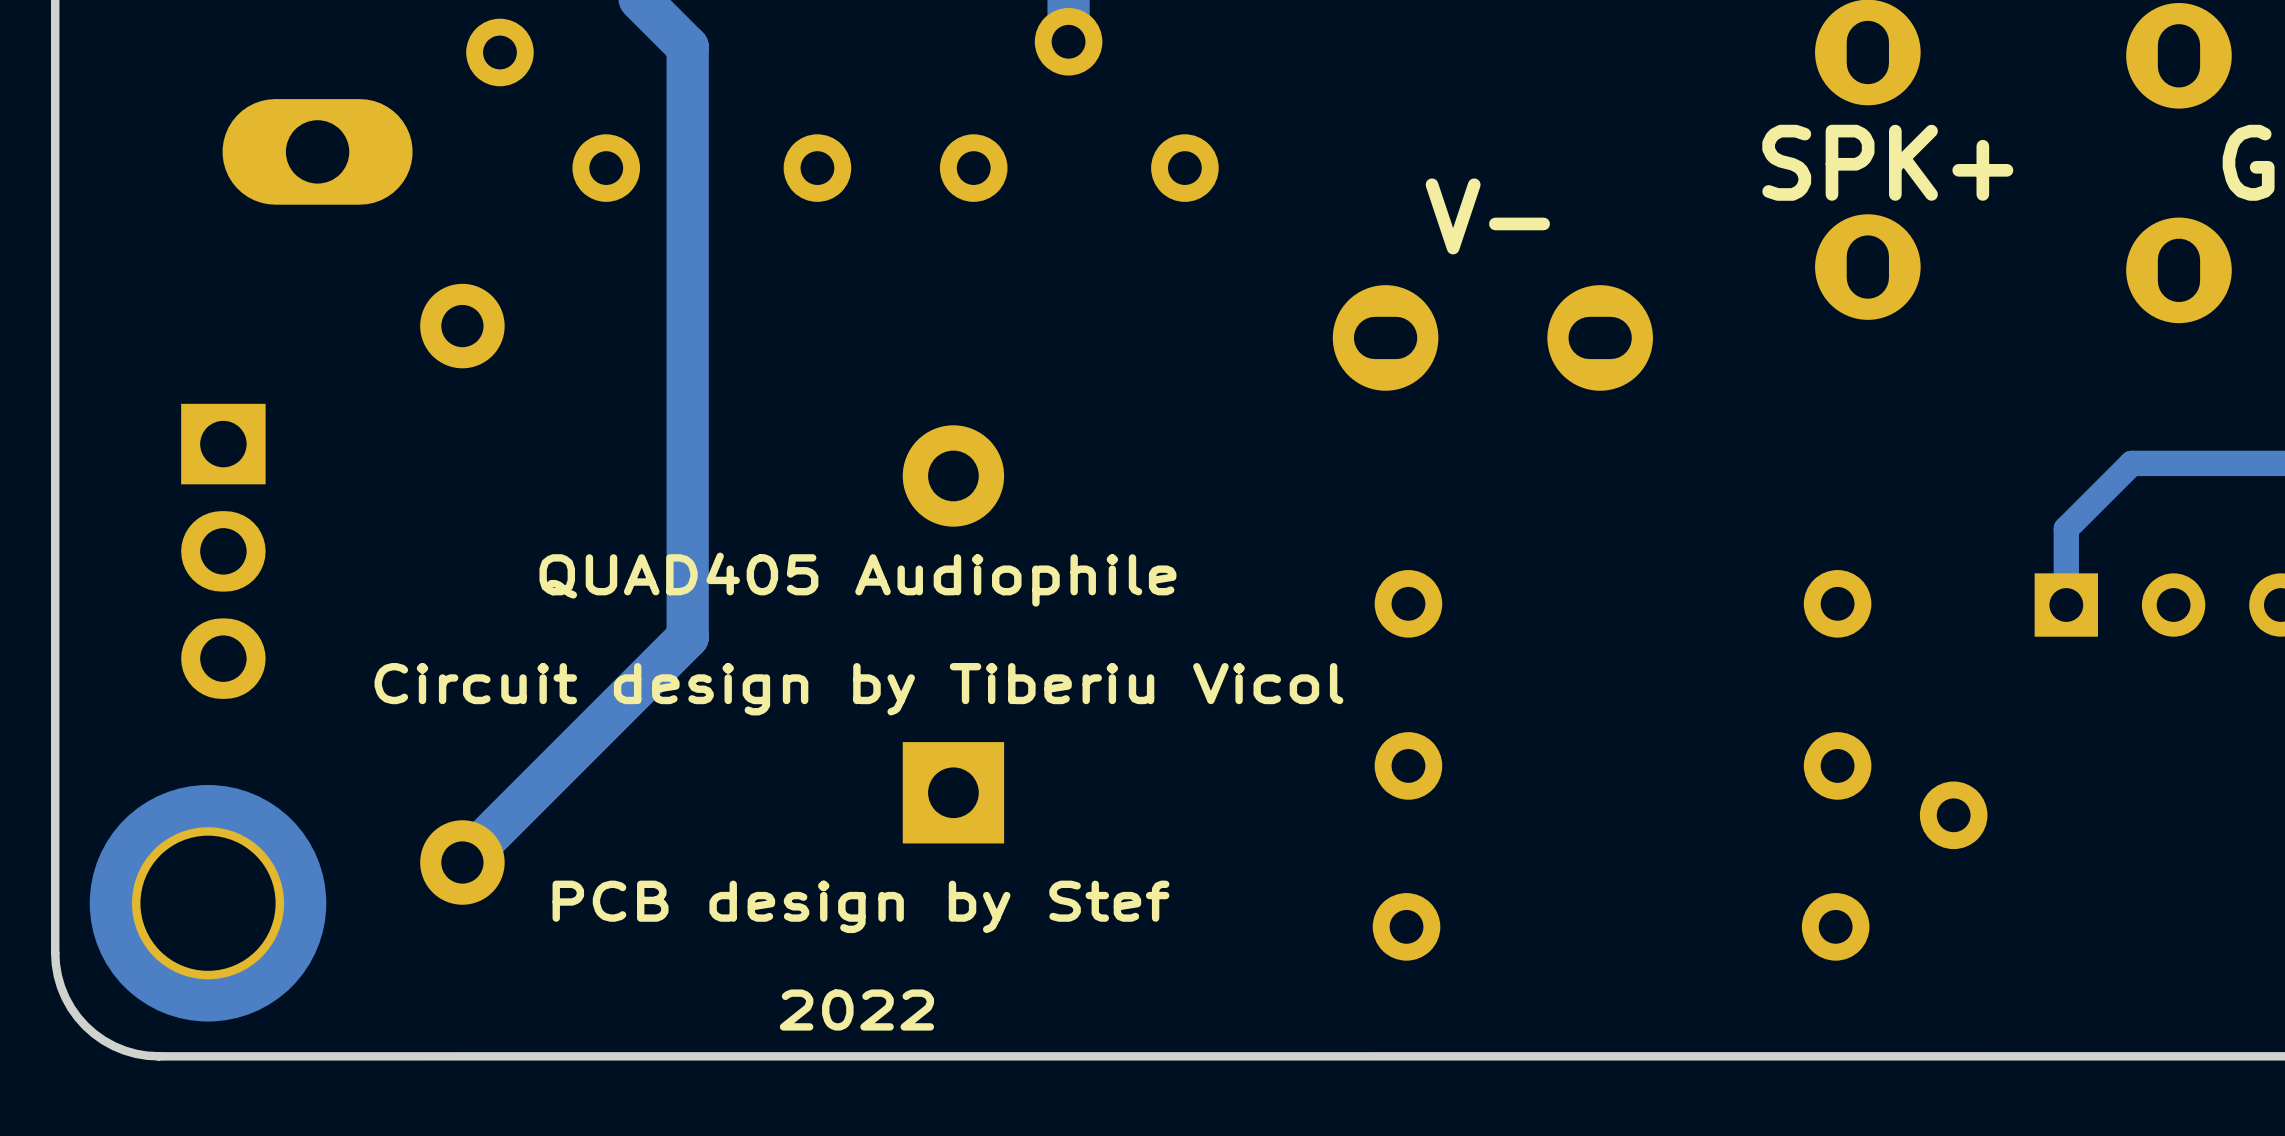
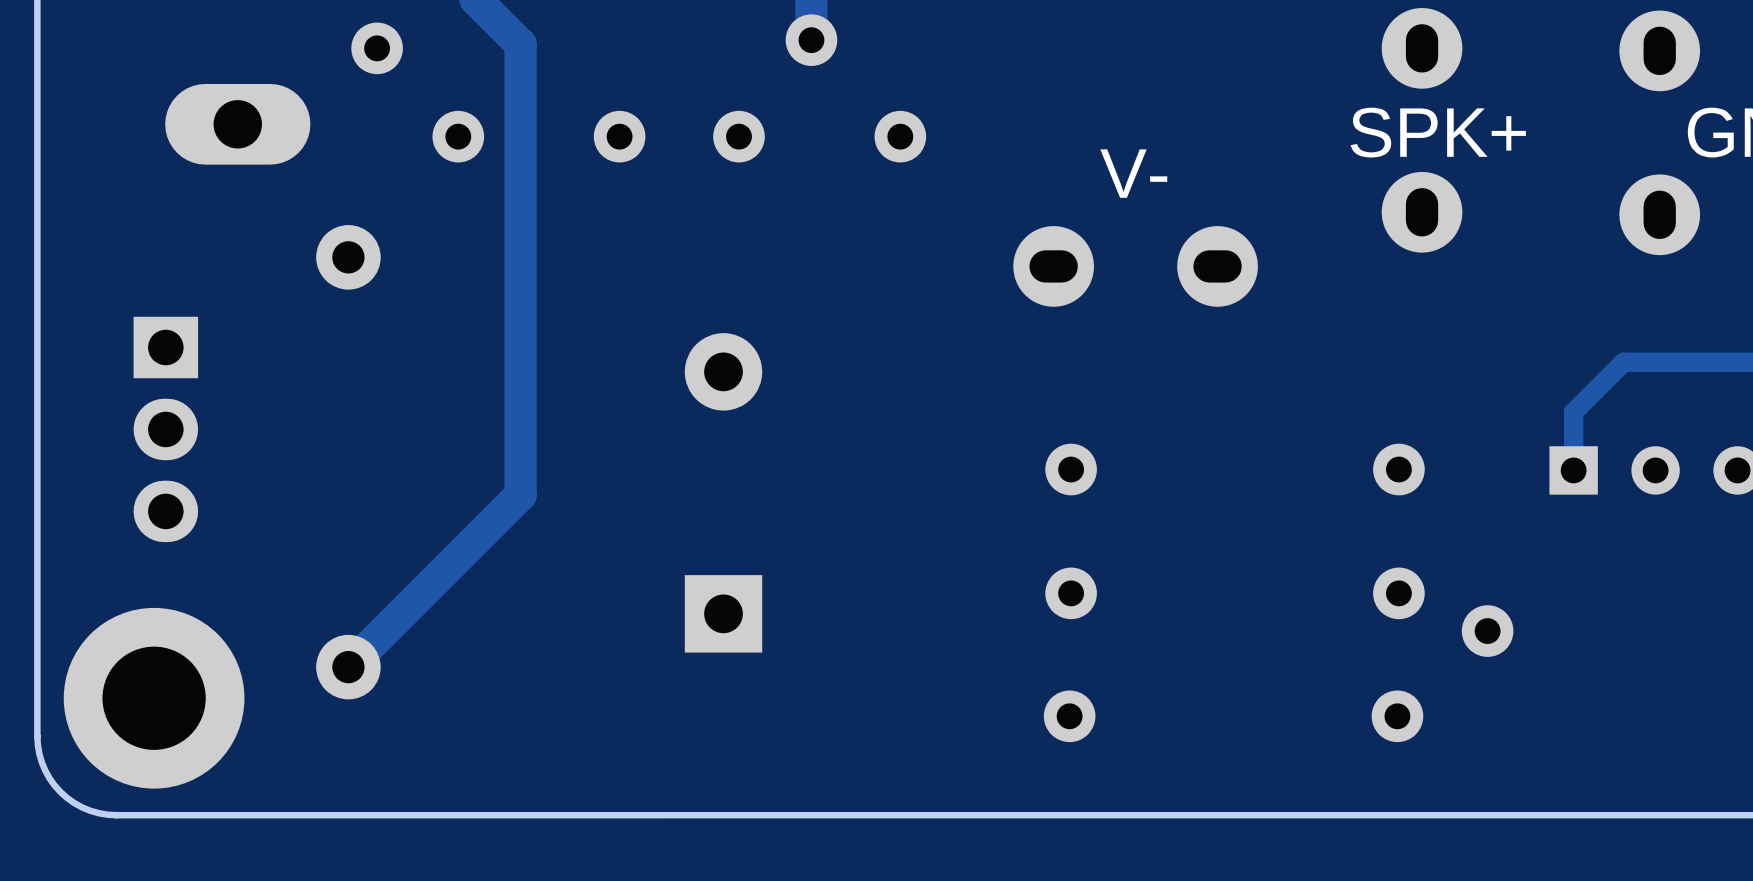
text: QUAD405 Audiophile (857, 579) -> none
text: Circuit design by Tiberiu Vicol (858, 689) -> none
text: PCB design by Stef (860, 906) -> none
text: 2022 (856, 1010) -> none

